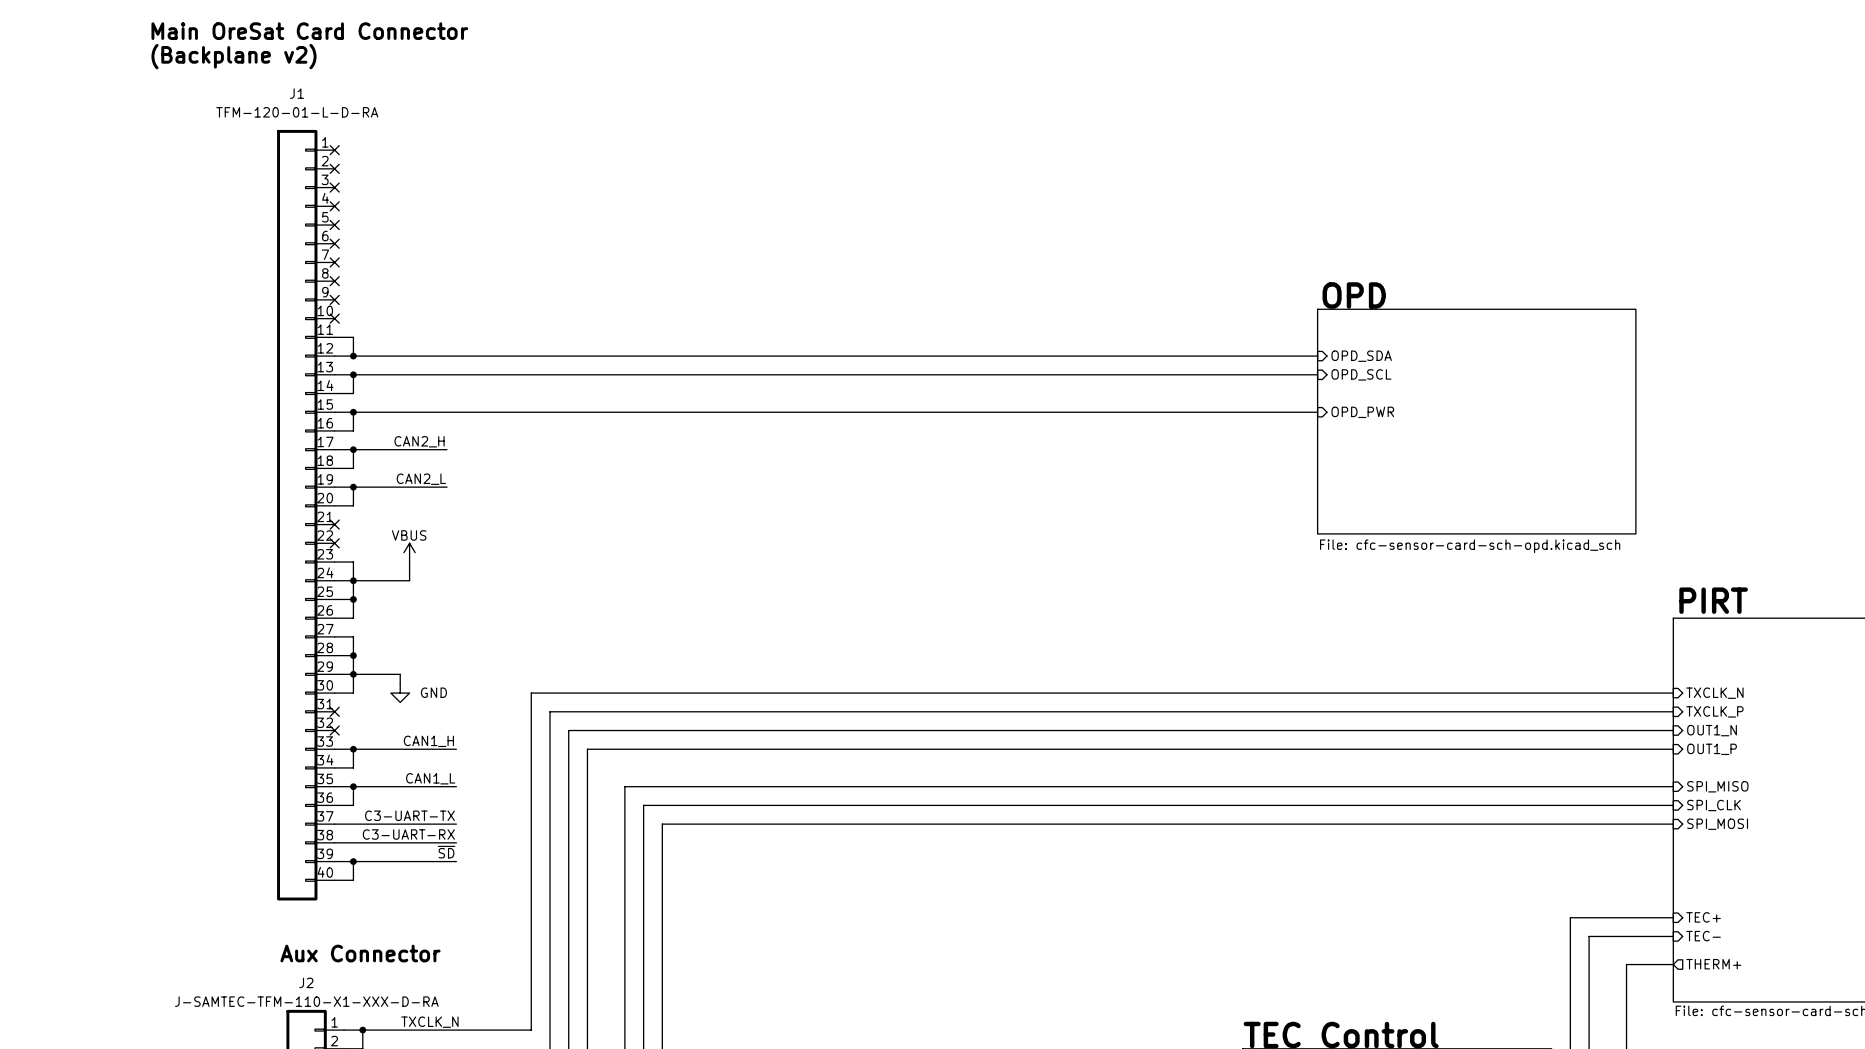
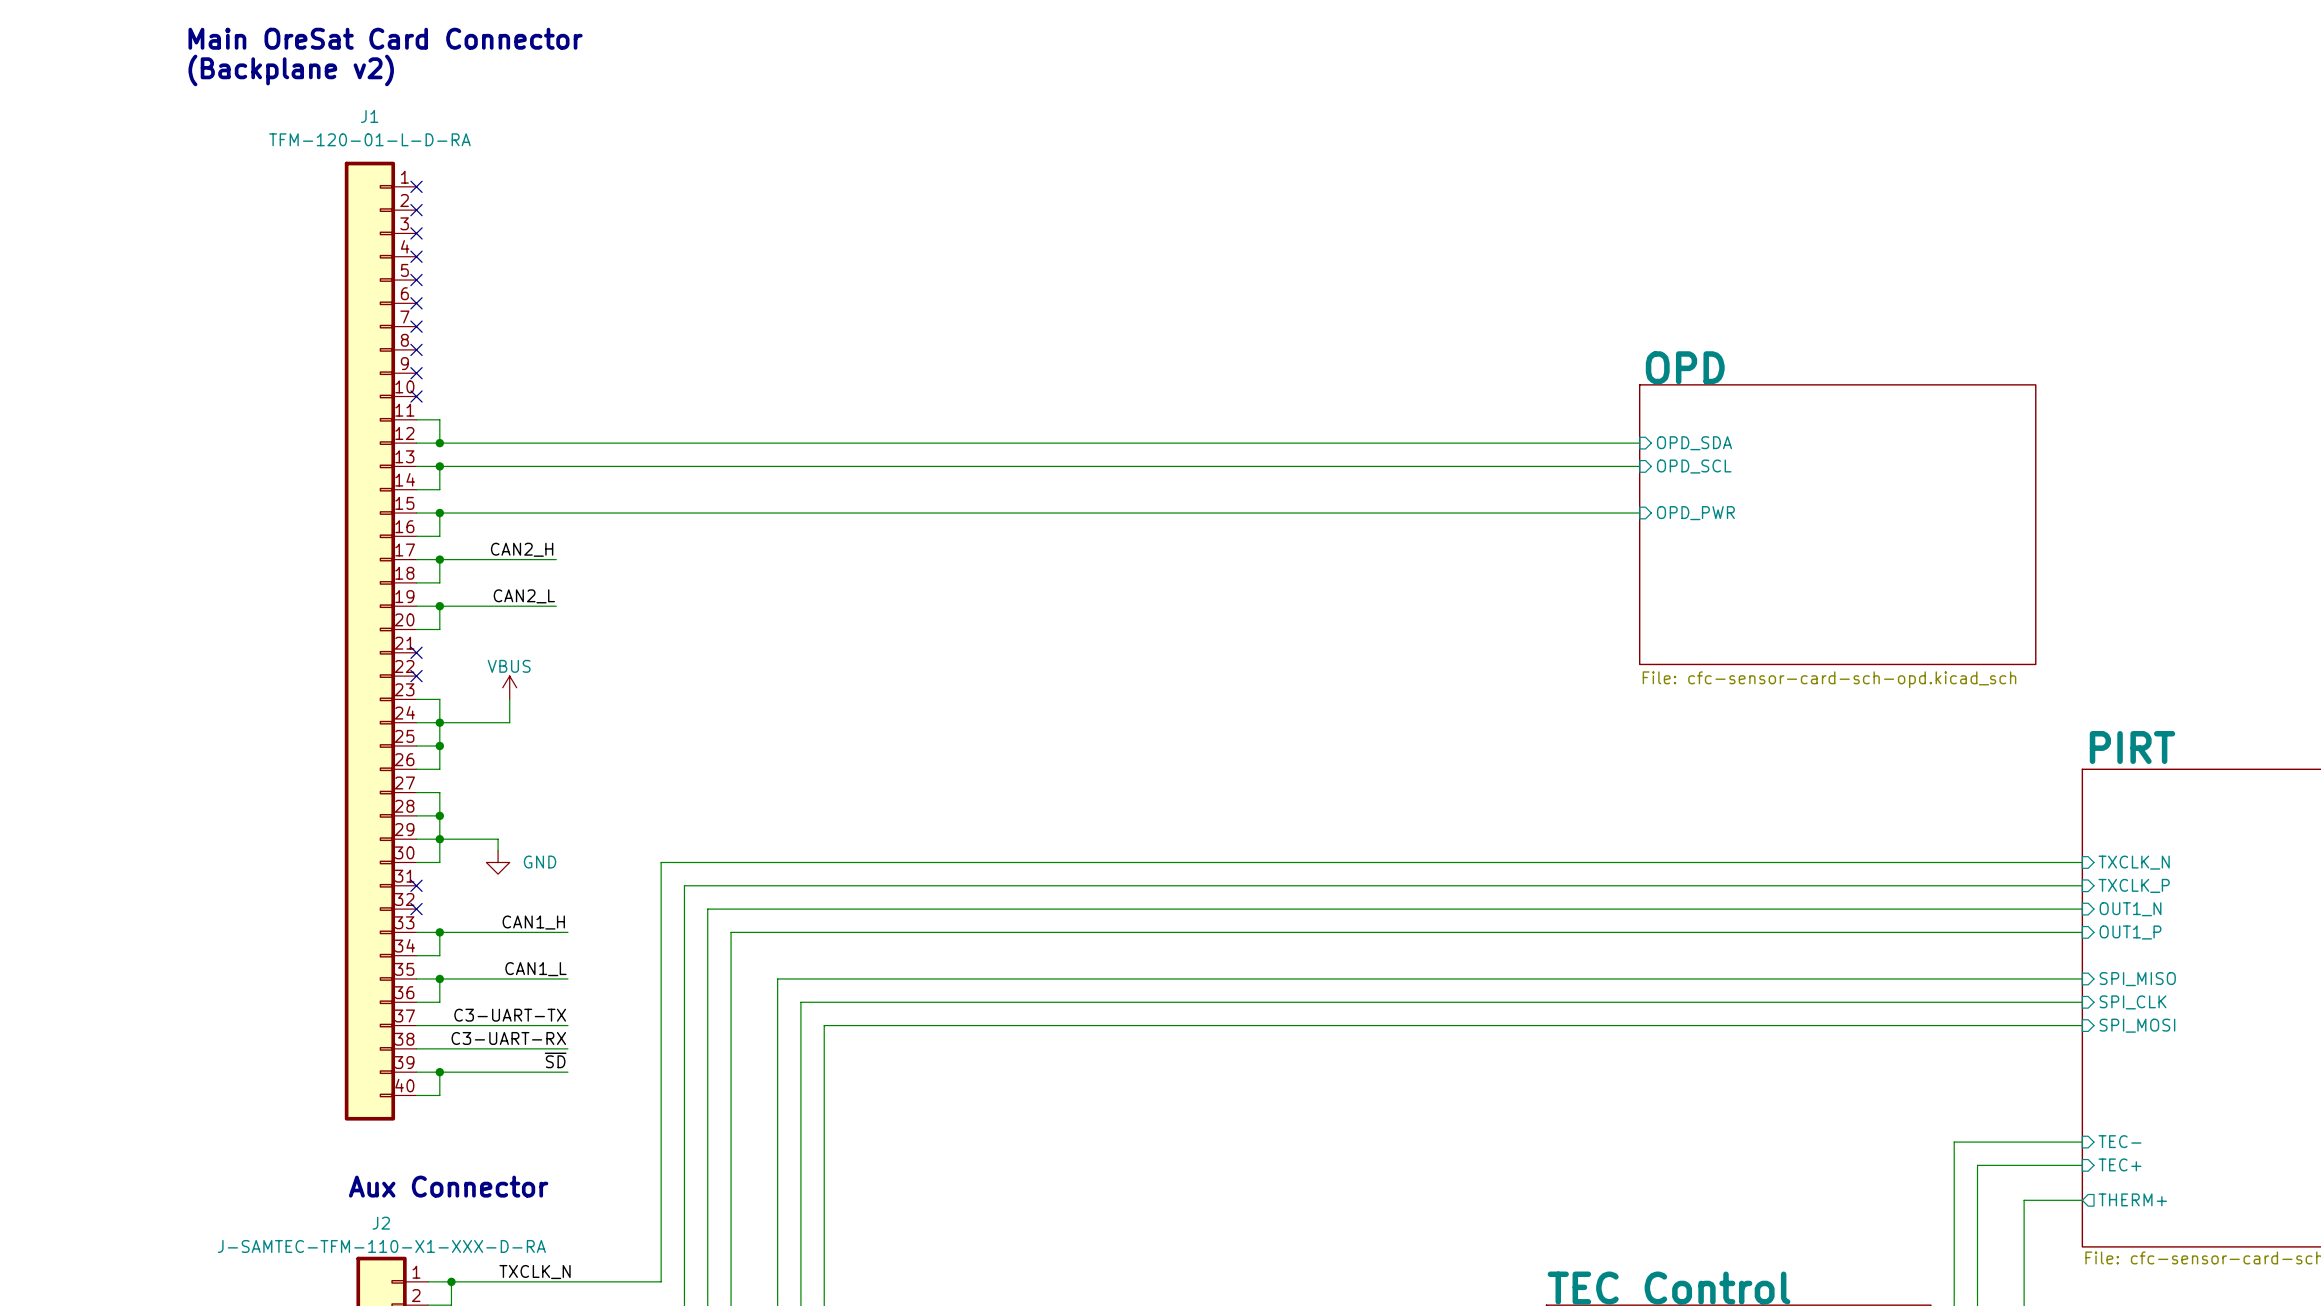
sheet pin: TEC+ (1703, 917) -> TEC- (2119, 1141)
sheet pin: TEC- (1703, 936) -> TEC+ (2119, 1164)

